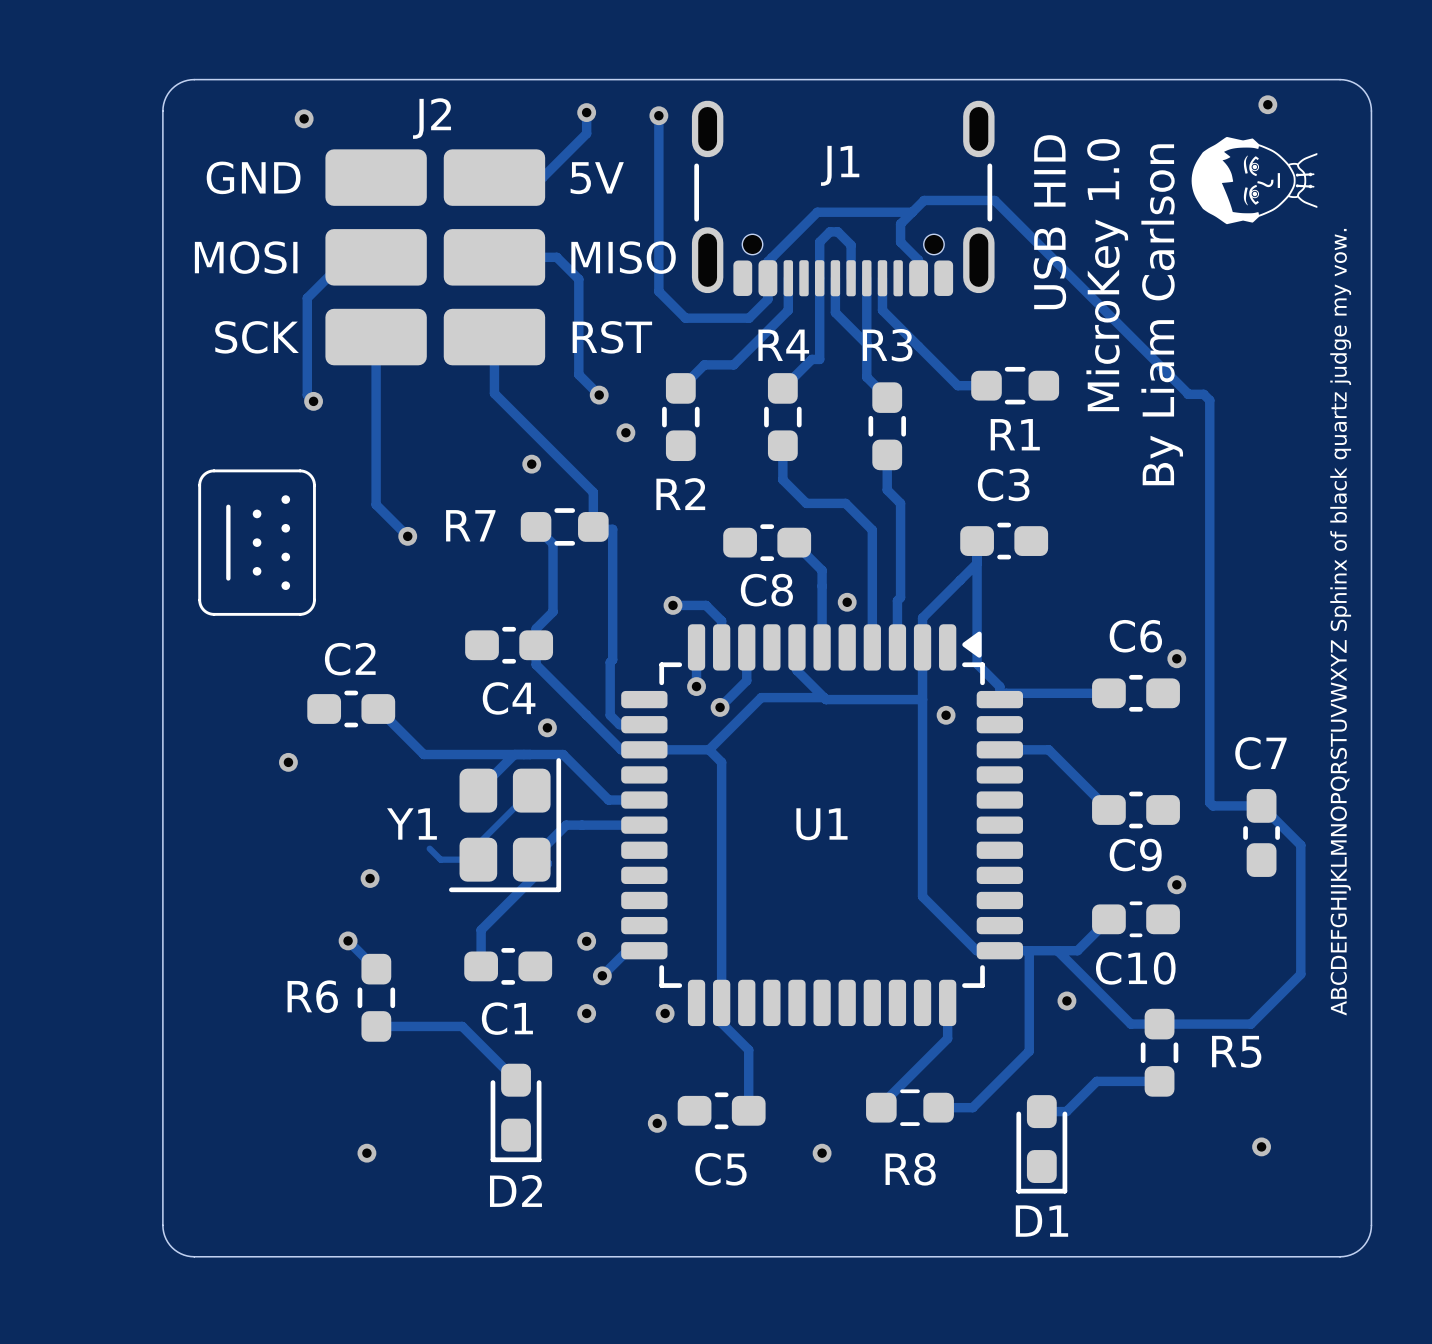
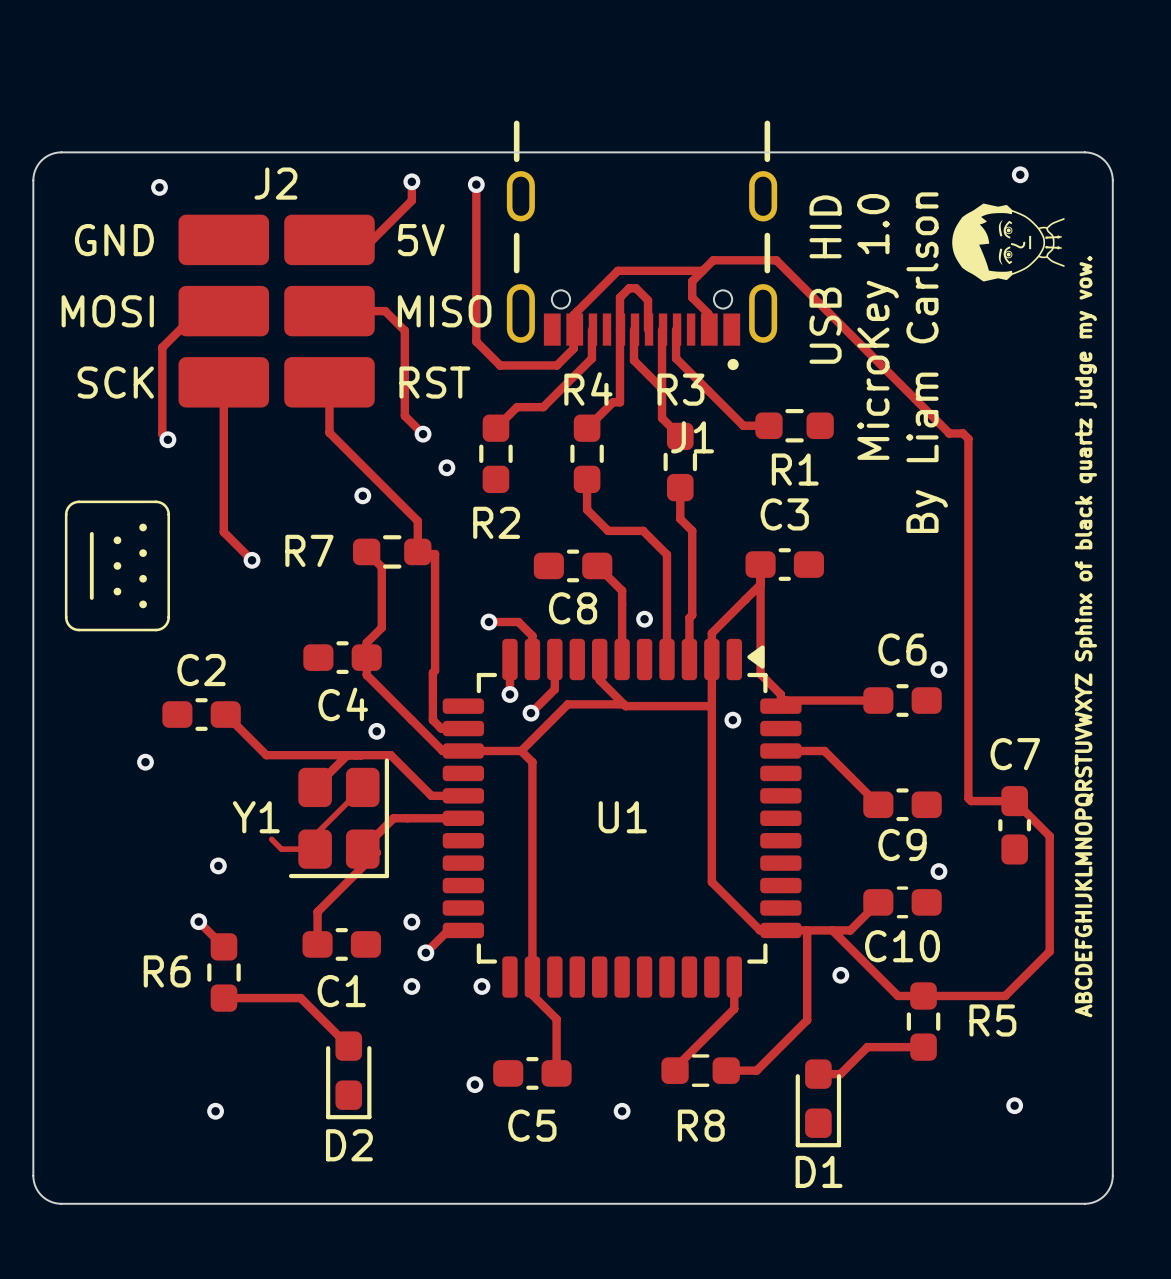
J1 footprint: [691, 100, 995, 297] -> [506, 120, 778, 371]
J1 name position: J1 (840, 165) -> J1 (692, 437)

